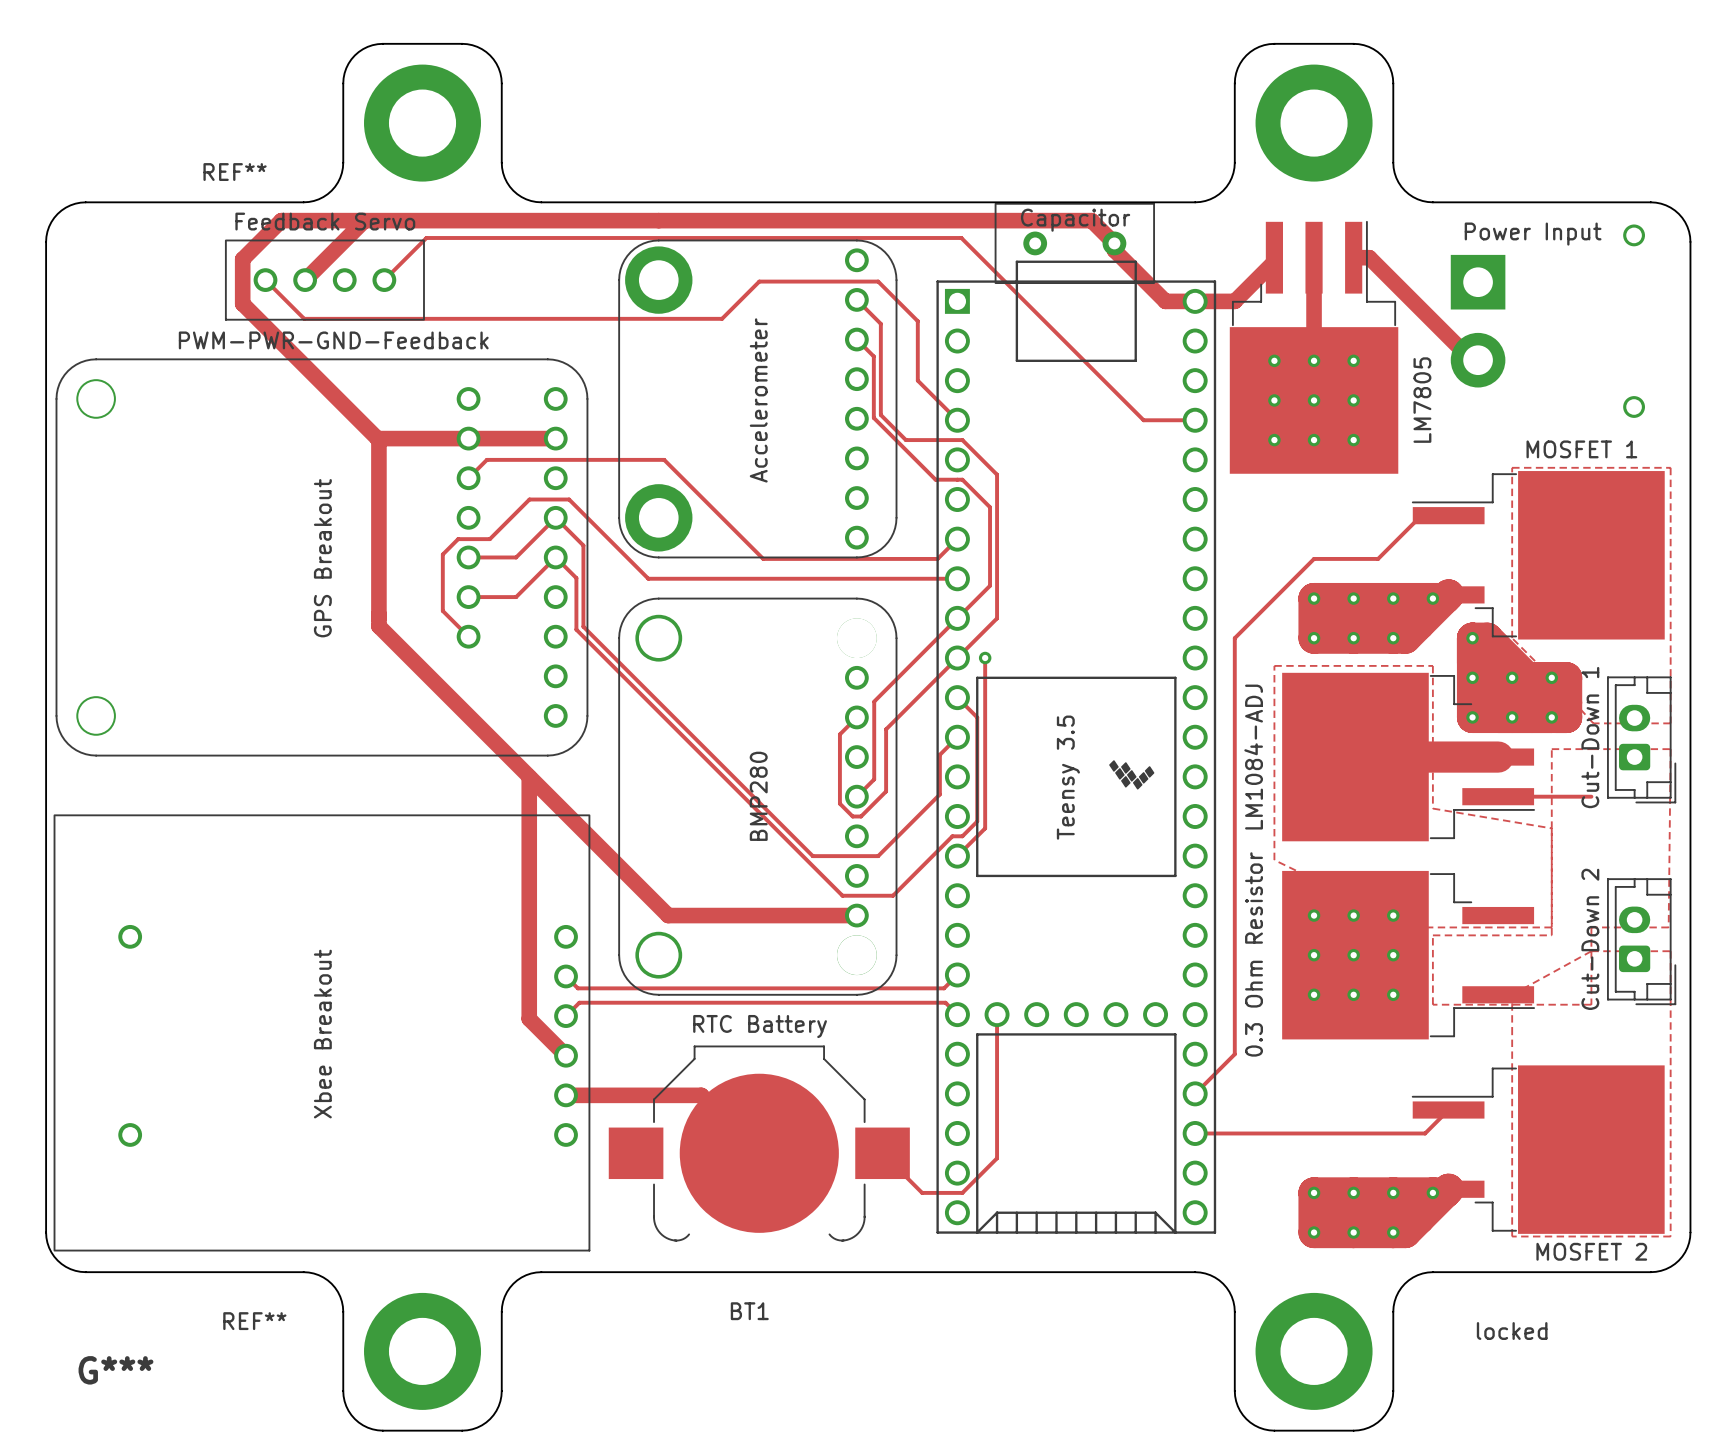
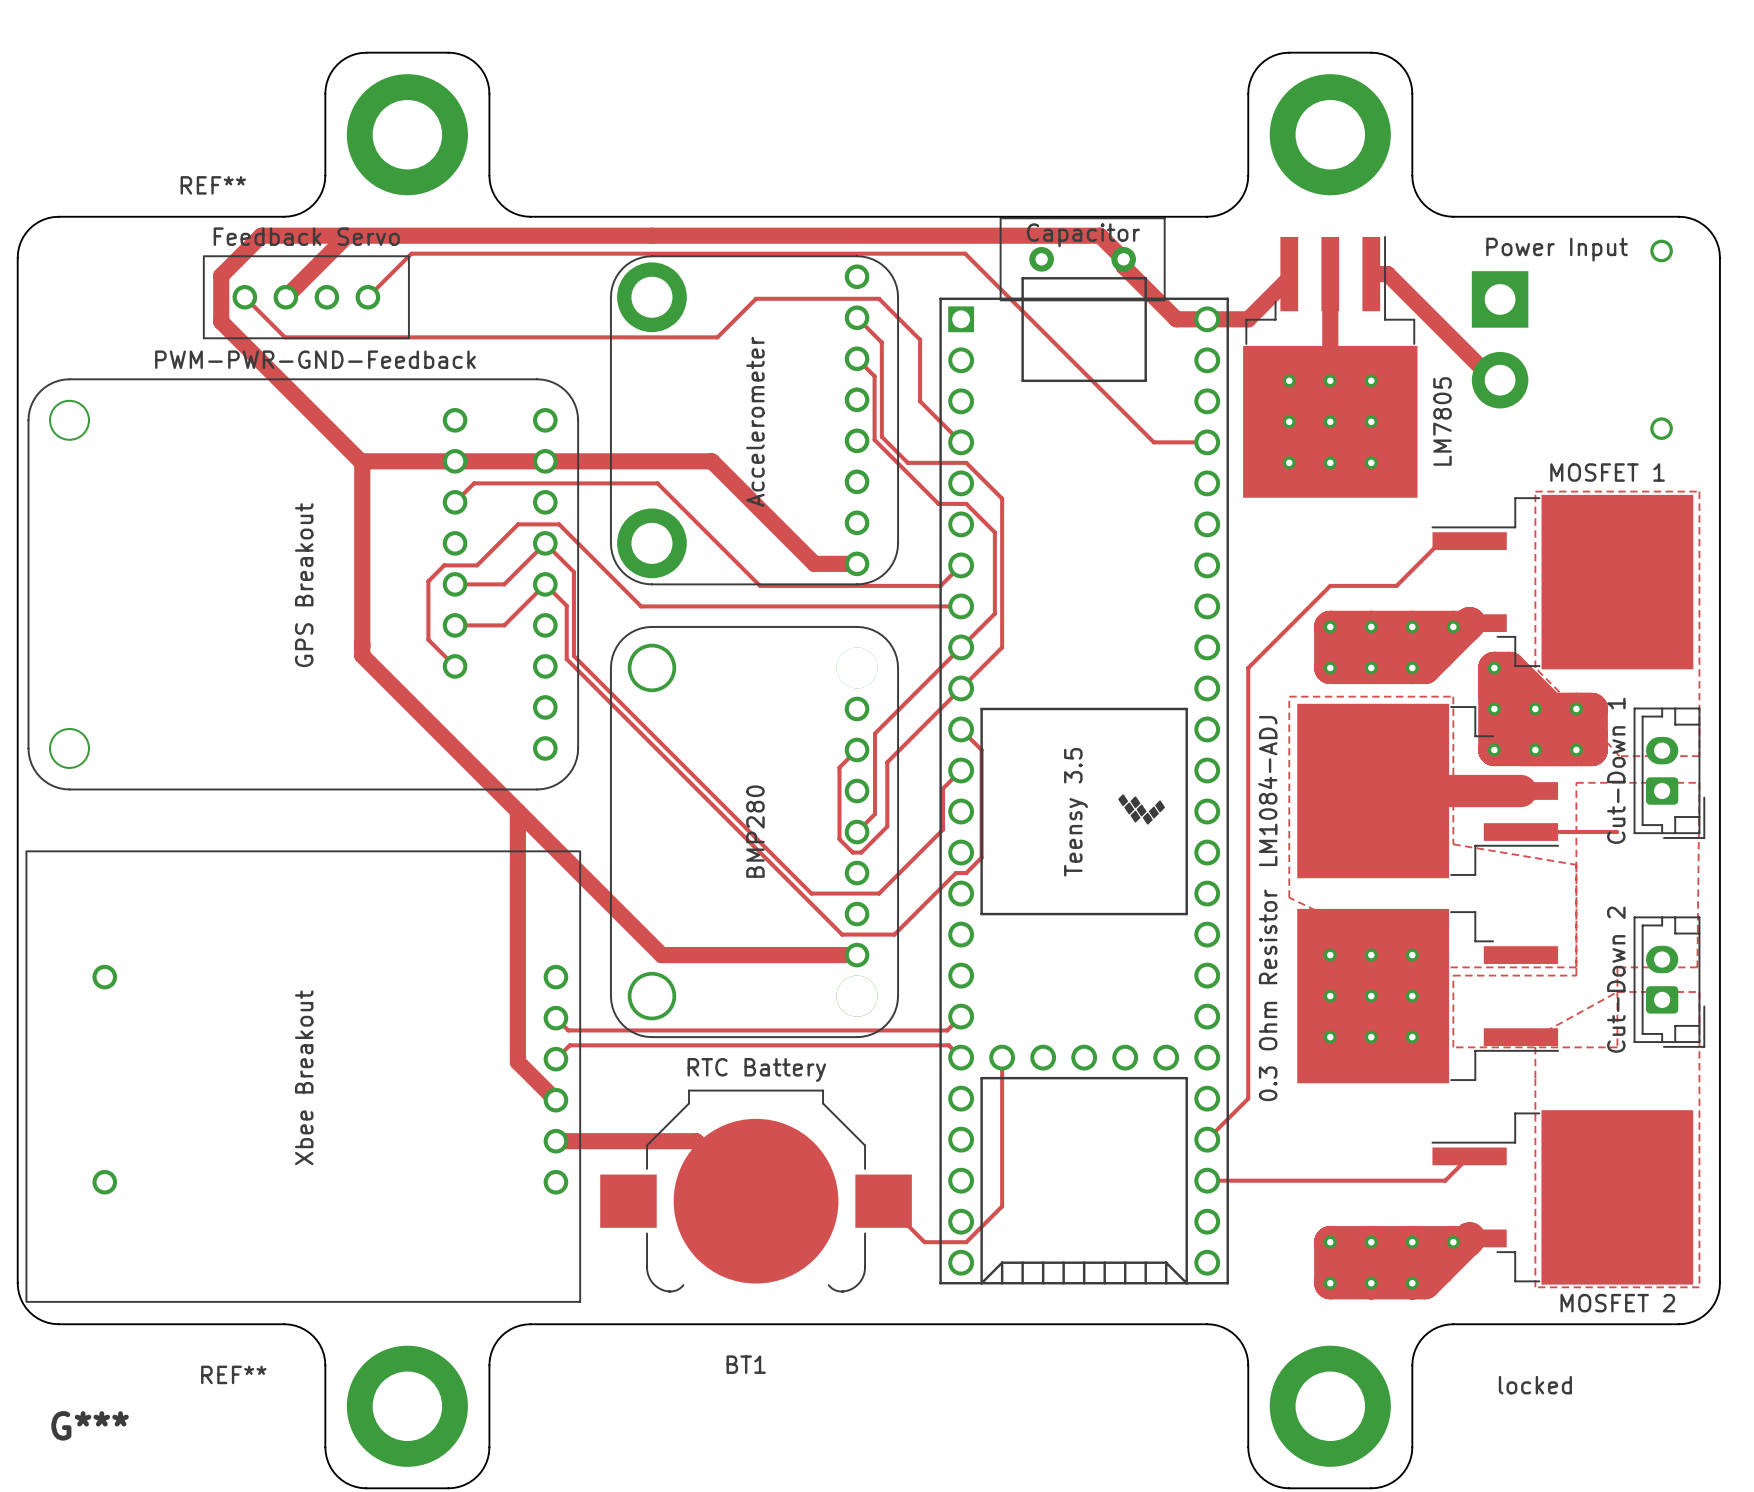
track: none -> (545, 461) (711, 461) (814, 563) (857, 563)
track: (985, 658) (985, 828) (957, 856) -> none
via: (985, 658) -> none

